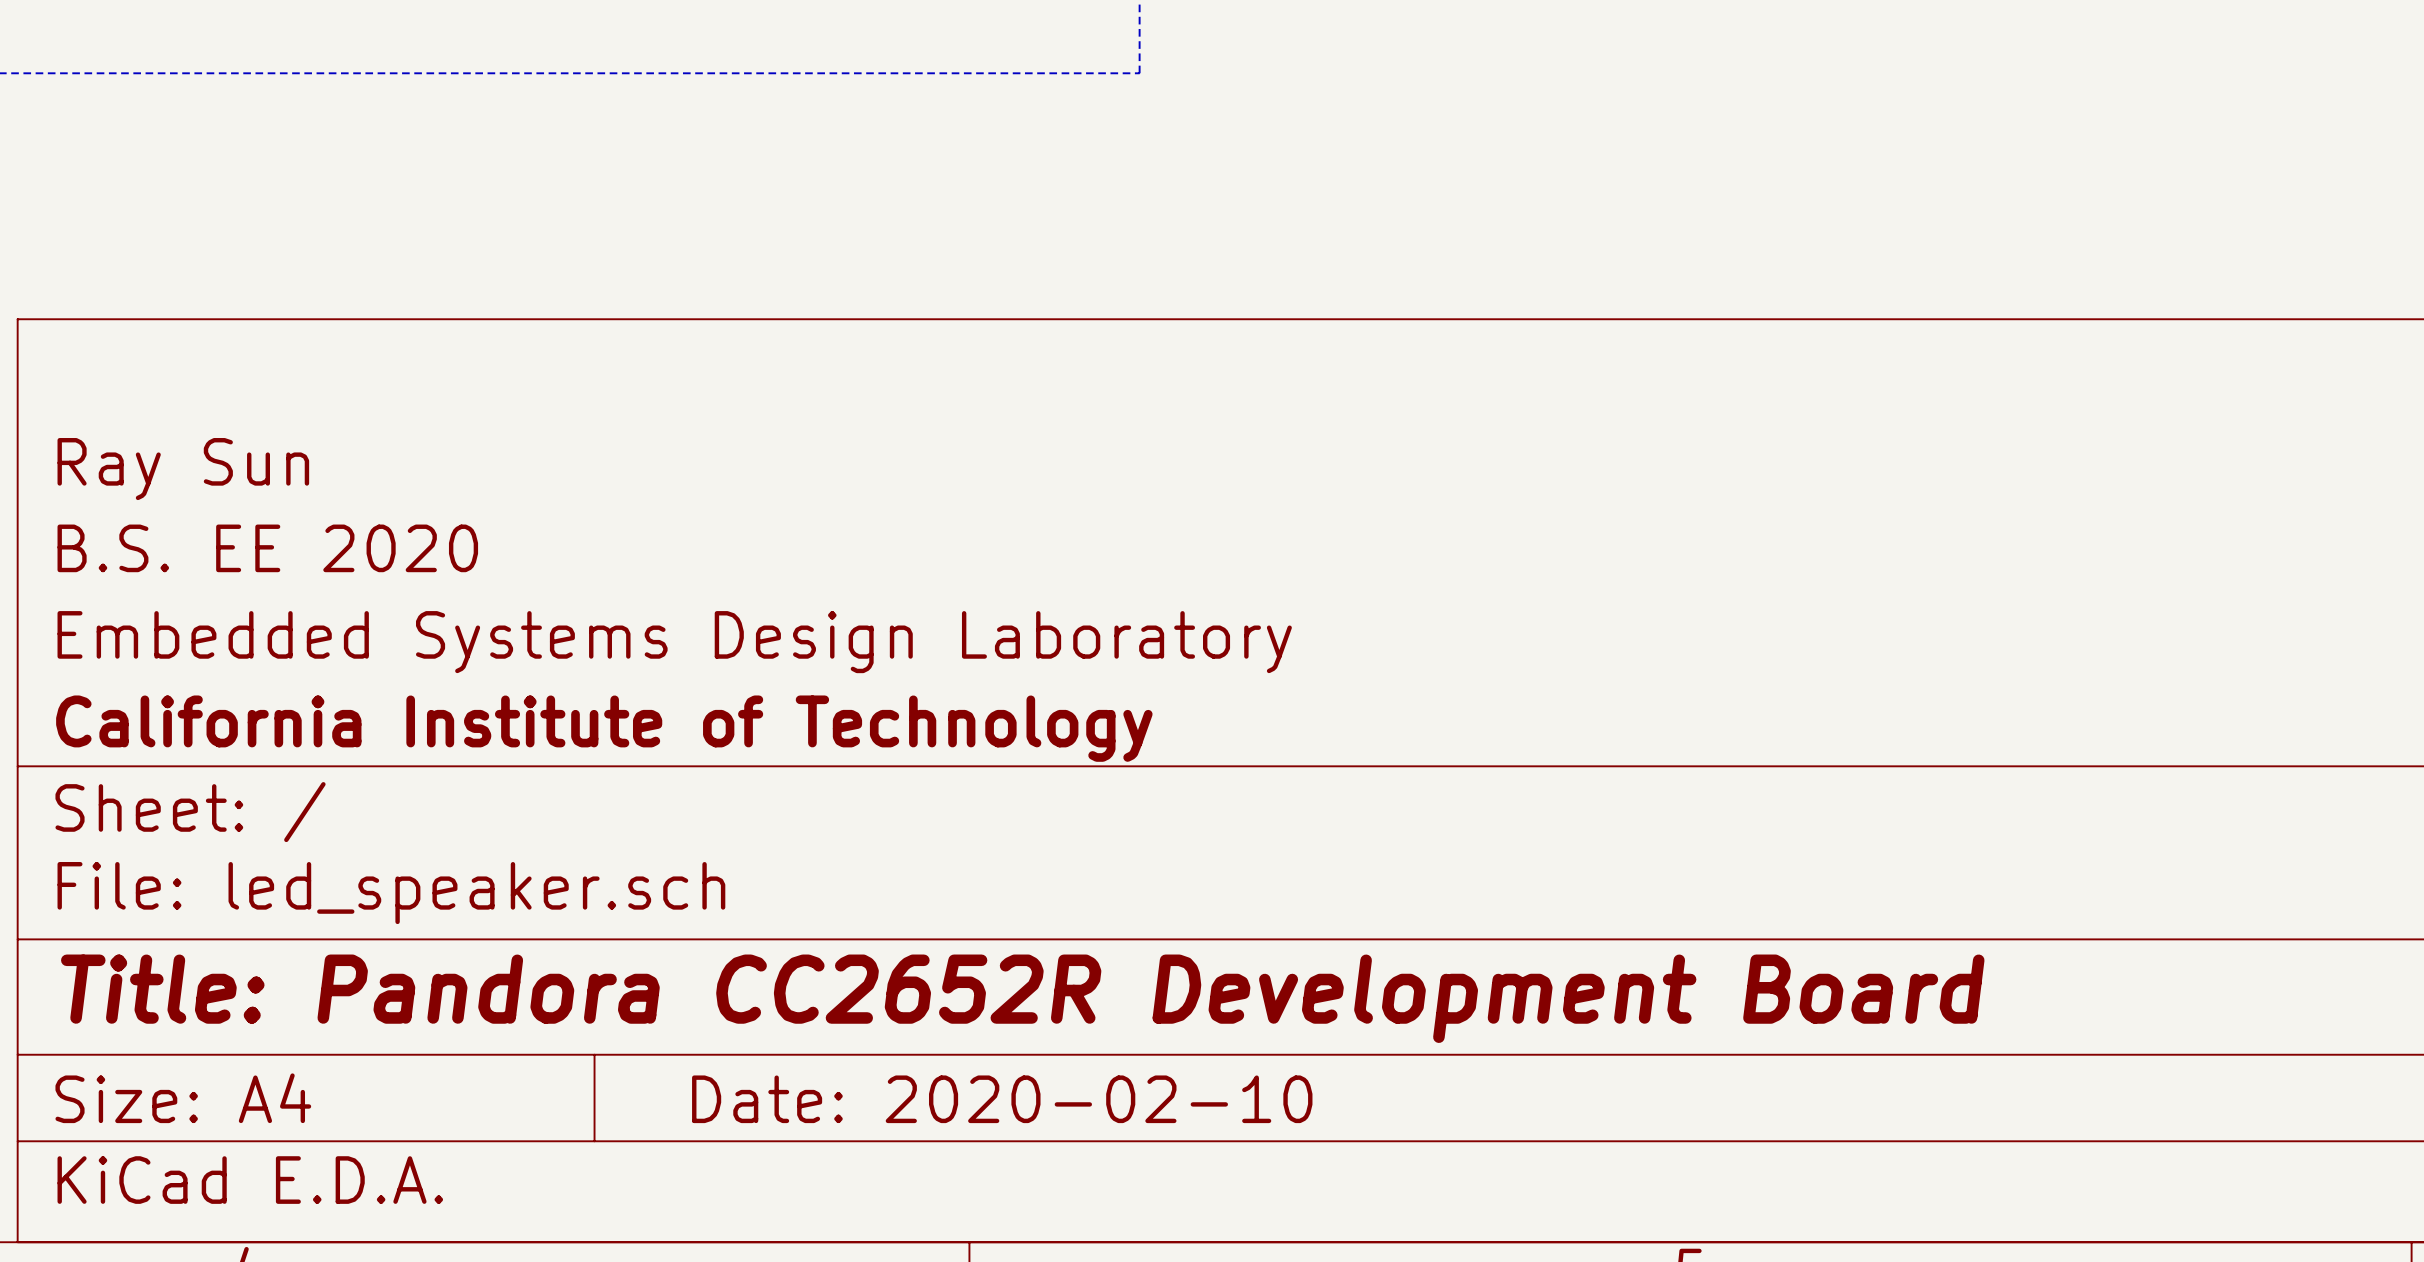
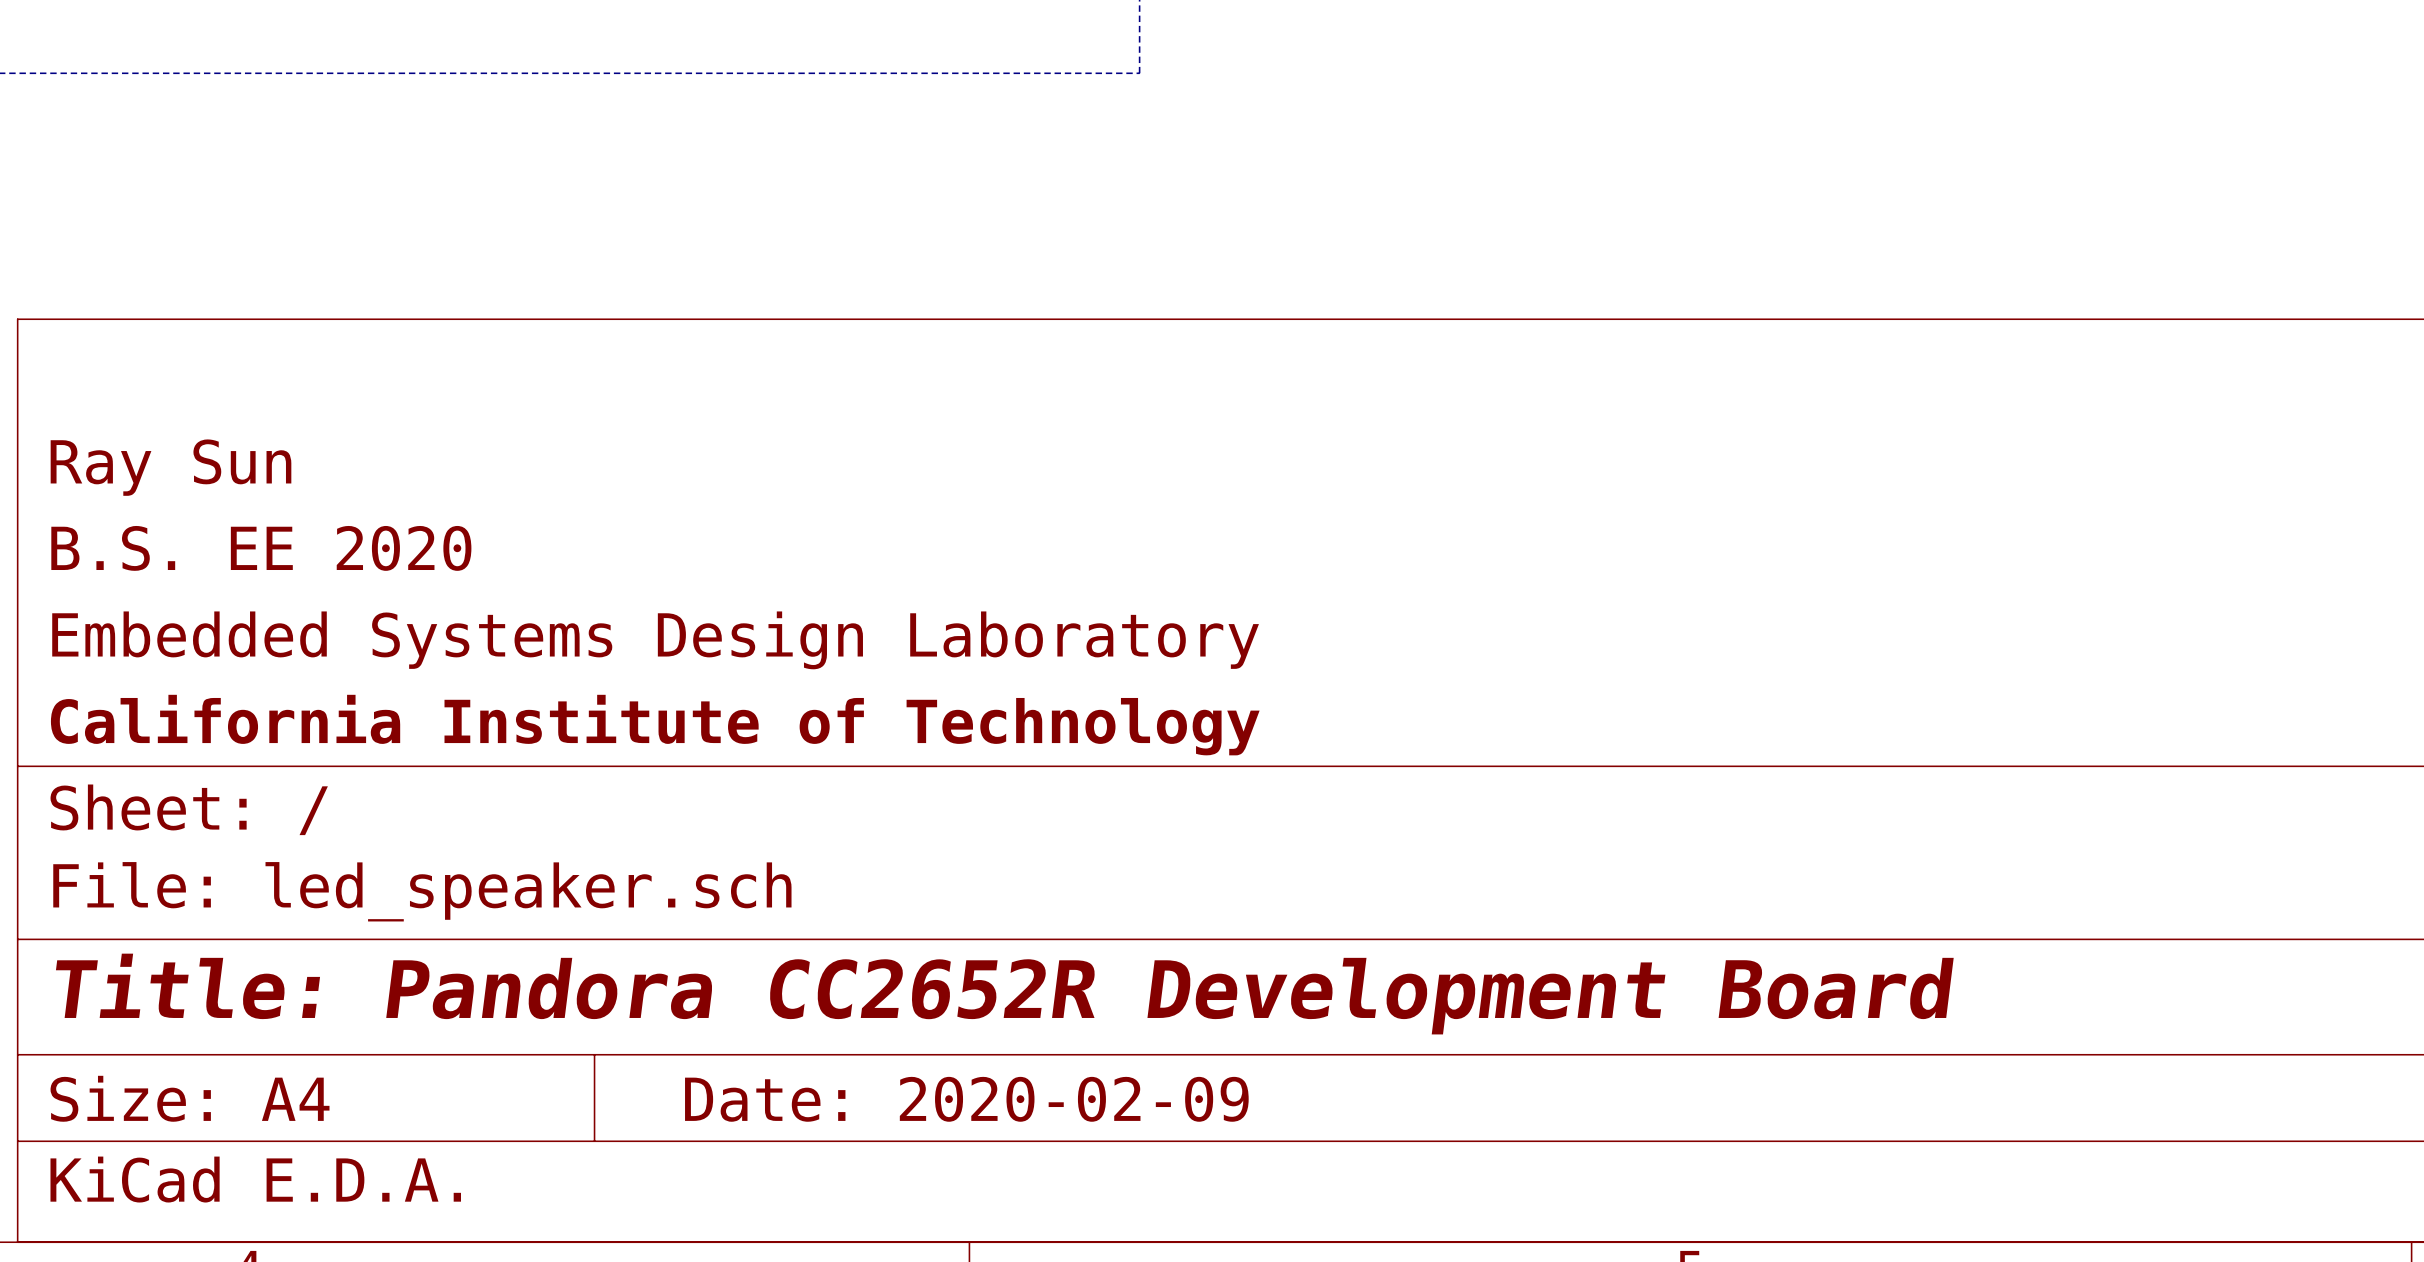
title block: Date: 2020-02-10 (1002, 1099) -> Date: 2020-02-09 (966, 1099)

